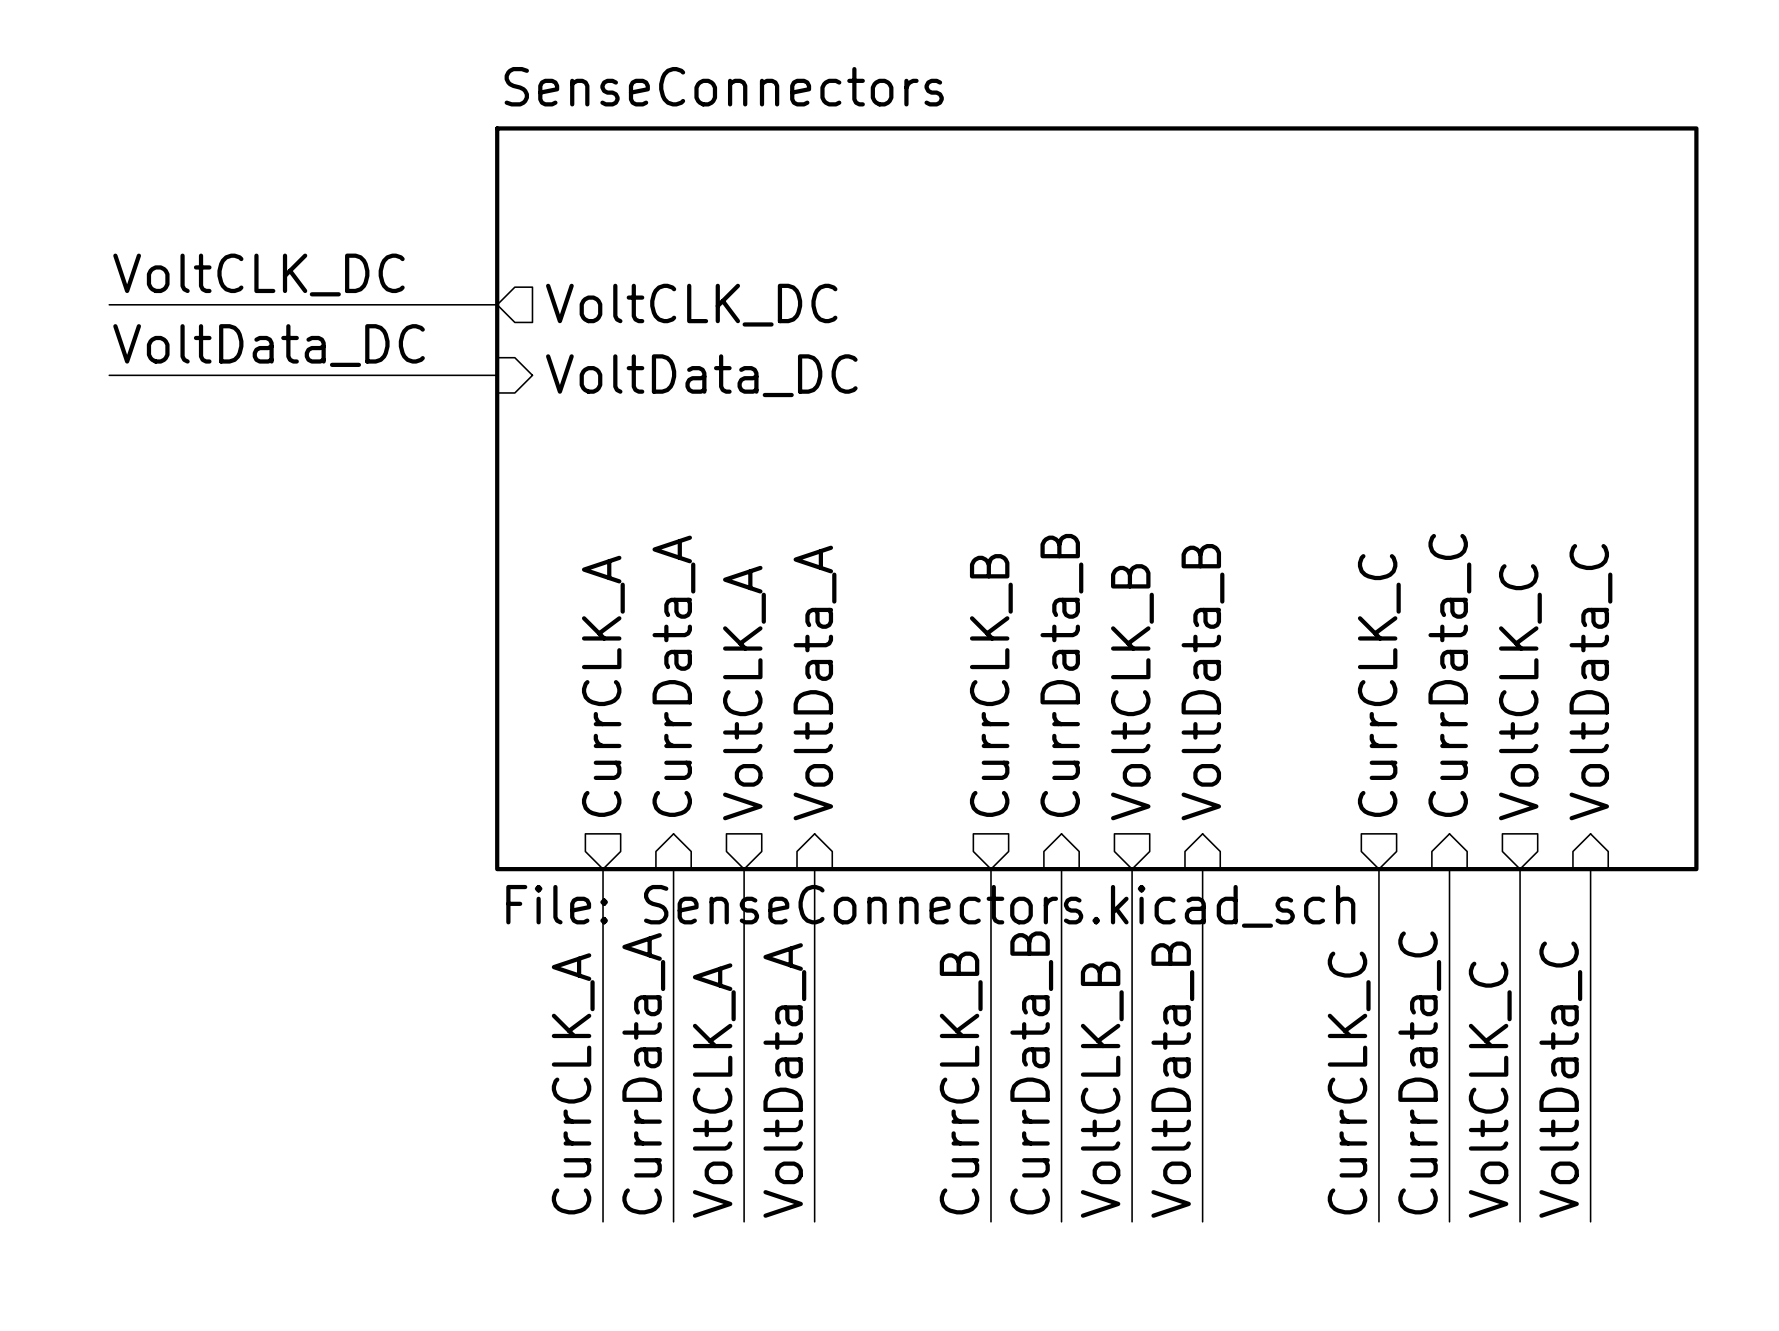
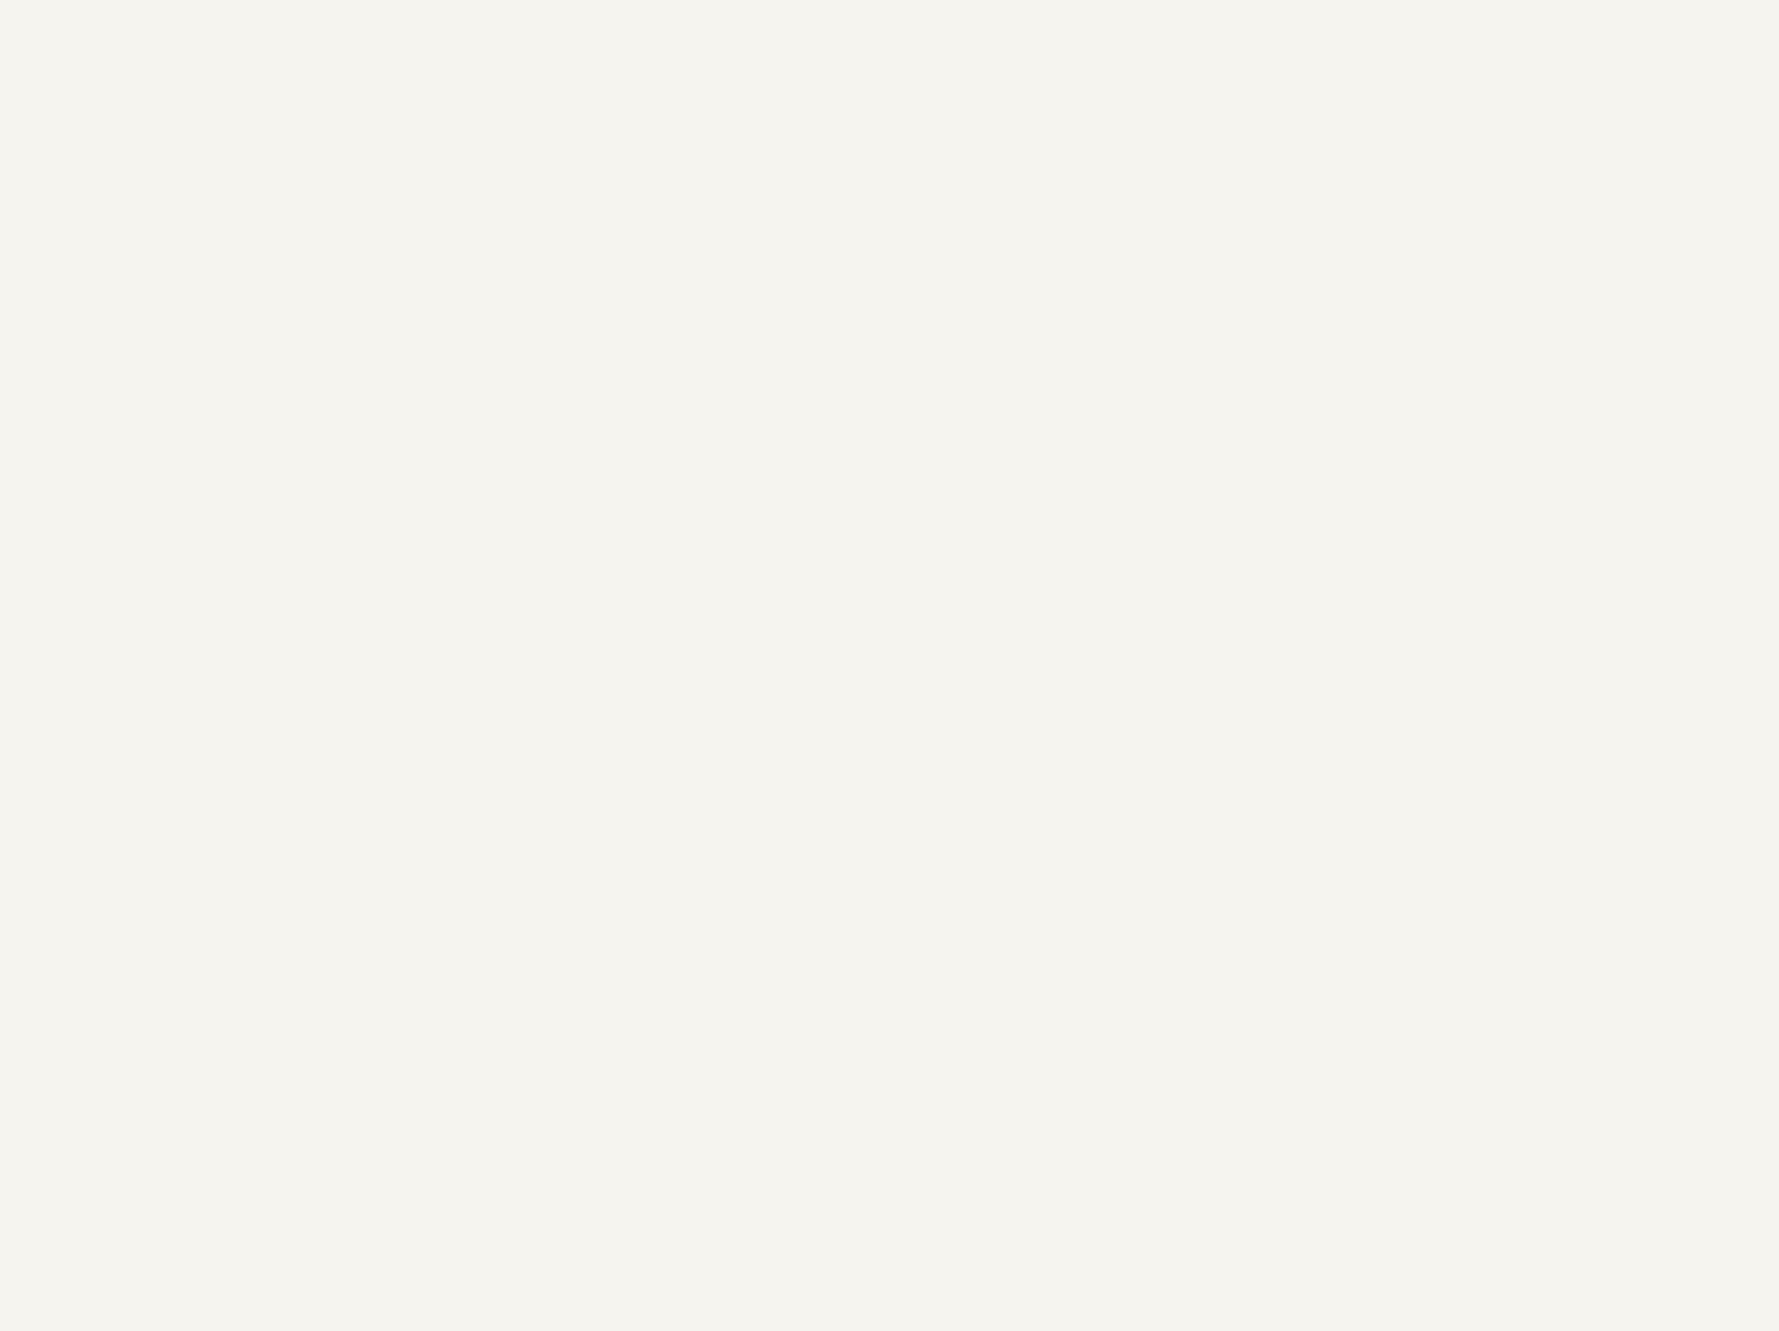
label: VoltCLK_DC (258, 275) -> none
wire: (109, 304) (497, 304) -> none
sheet pin: VoltCLK_DC (691, 305) -> none
label: VoltData_DC (269, 345) -> none
wire: (109, 375) (497, 375) -> none
sheet pin: VoltData_DC (701, 375) -> none
sheet SenseConnectors: File: SenseConnectors.kicad_sch (1096, 498) -> none
sheet pin: CurrData_B (1061, 675) -> none
sheet pin: CurrData_C (1449, 675) -> none
sheet pin: CurrData_A (673, 676) -> none
sheet pin: VoltData_A (815, 682) -> none
sheet pin: VoltData_B (1202, 682) -> none
sheet pin: VoltData_C (1590, 682) -> none
sheet pin: CurrCLK_B (991, 685) -> none
sheet pin: CurrCLK_C (1379, 685) -> none
sheet pin: CurrCLK_A (603, 686) -> none
sheet pin: VoltCLK_B (1132, 692) -> none
sheet pin: VoltCLK_C (1520, 692) -> none
sheet pin: VoltCLK_A (744, 693) -> none
wire: (603, 869) (603, 1221) -> none
wire: (673, 869) (673, 1221) -> none
wire: (744, 869) (744, 1221) -> none
wire: (814, 869) (814, 1221) -> none
wire: (990, 869) (990, 1221) -> none
wire: (1061, 869) (1061, 1221) -> none
wire: (1132, 869) (1132, 1221) -> none
wire: (1202, 869) (1202, 1221) -> none
wire: (1378, 869) (1378, 1221) -> none
wire: (1449, 869) (1449, 1221) -> none
wire: (1520, 869) (1520, 1221) -> none
wire: (1590, 869) (1590, 1221) -> none
label: CurrData_B (1031, 1072) -> none
label: CurrData_C (1419, 1072) -> none
label: CurrData_A (643, 1073) -> none
label: VoltData_B (1172, 1079) -> none
label: VoltData_C (1560, 1079) -> none
label: VoltData_A (784, 1080) -> none
label: CurrCLK_A (573, 1083) -> none
label: CurrCLK_B (961, 1083) -> none
label: CurrCLK_C (1349, 1083) -> none
label: VoltCLK_B (1102, 1089) -> none
label: VoltCLK_C (1490, 1089) -> none
label: VoltCLK_A (714, 1090) -> none

